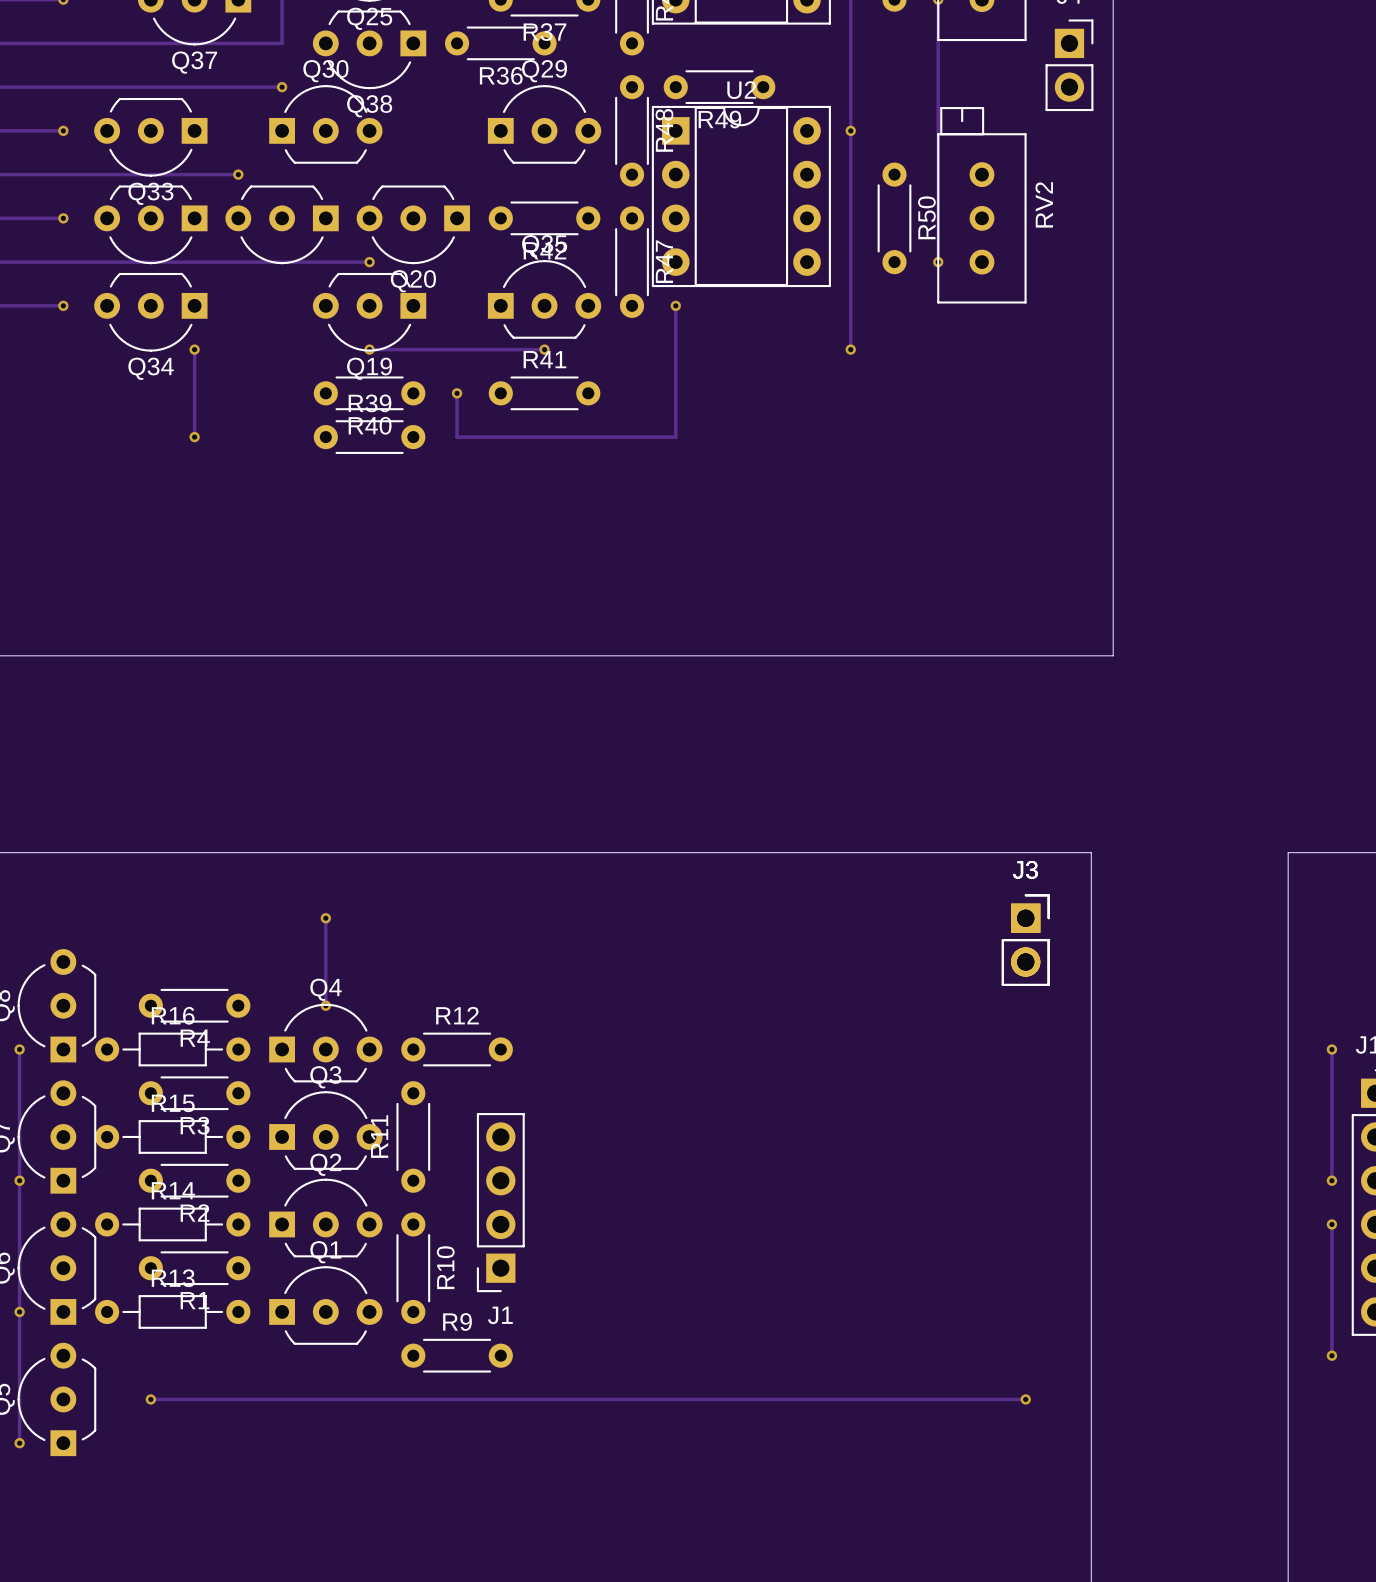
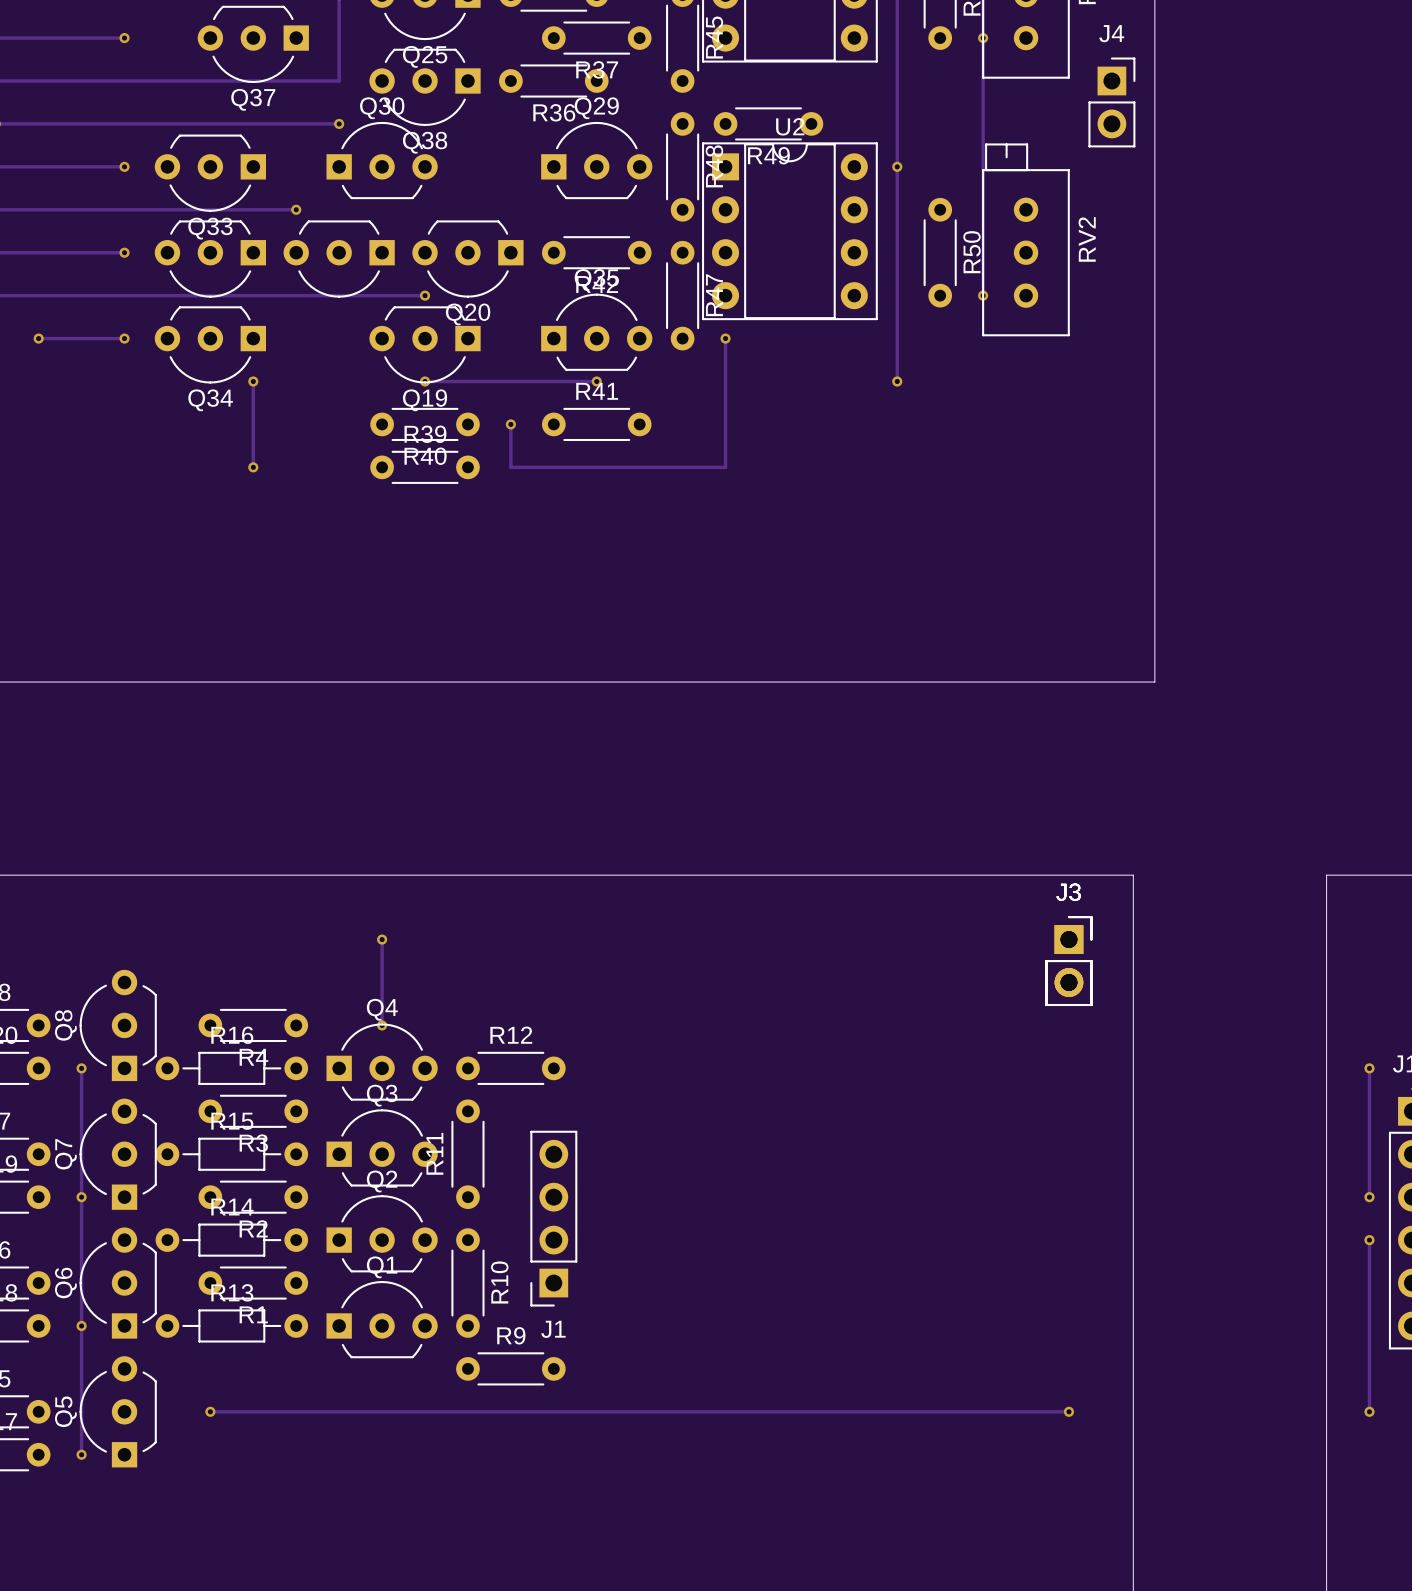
track: none -> (1369, 1368) (1369, 1411)
via position: (1331, 1355) -> (1369, 1411)

